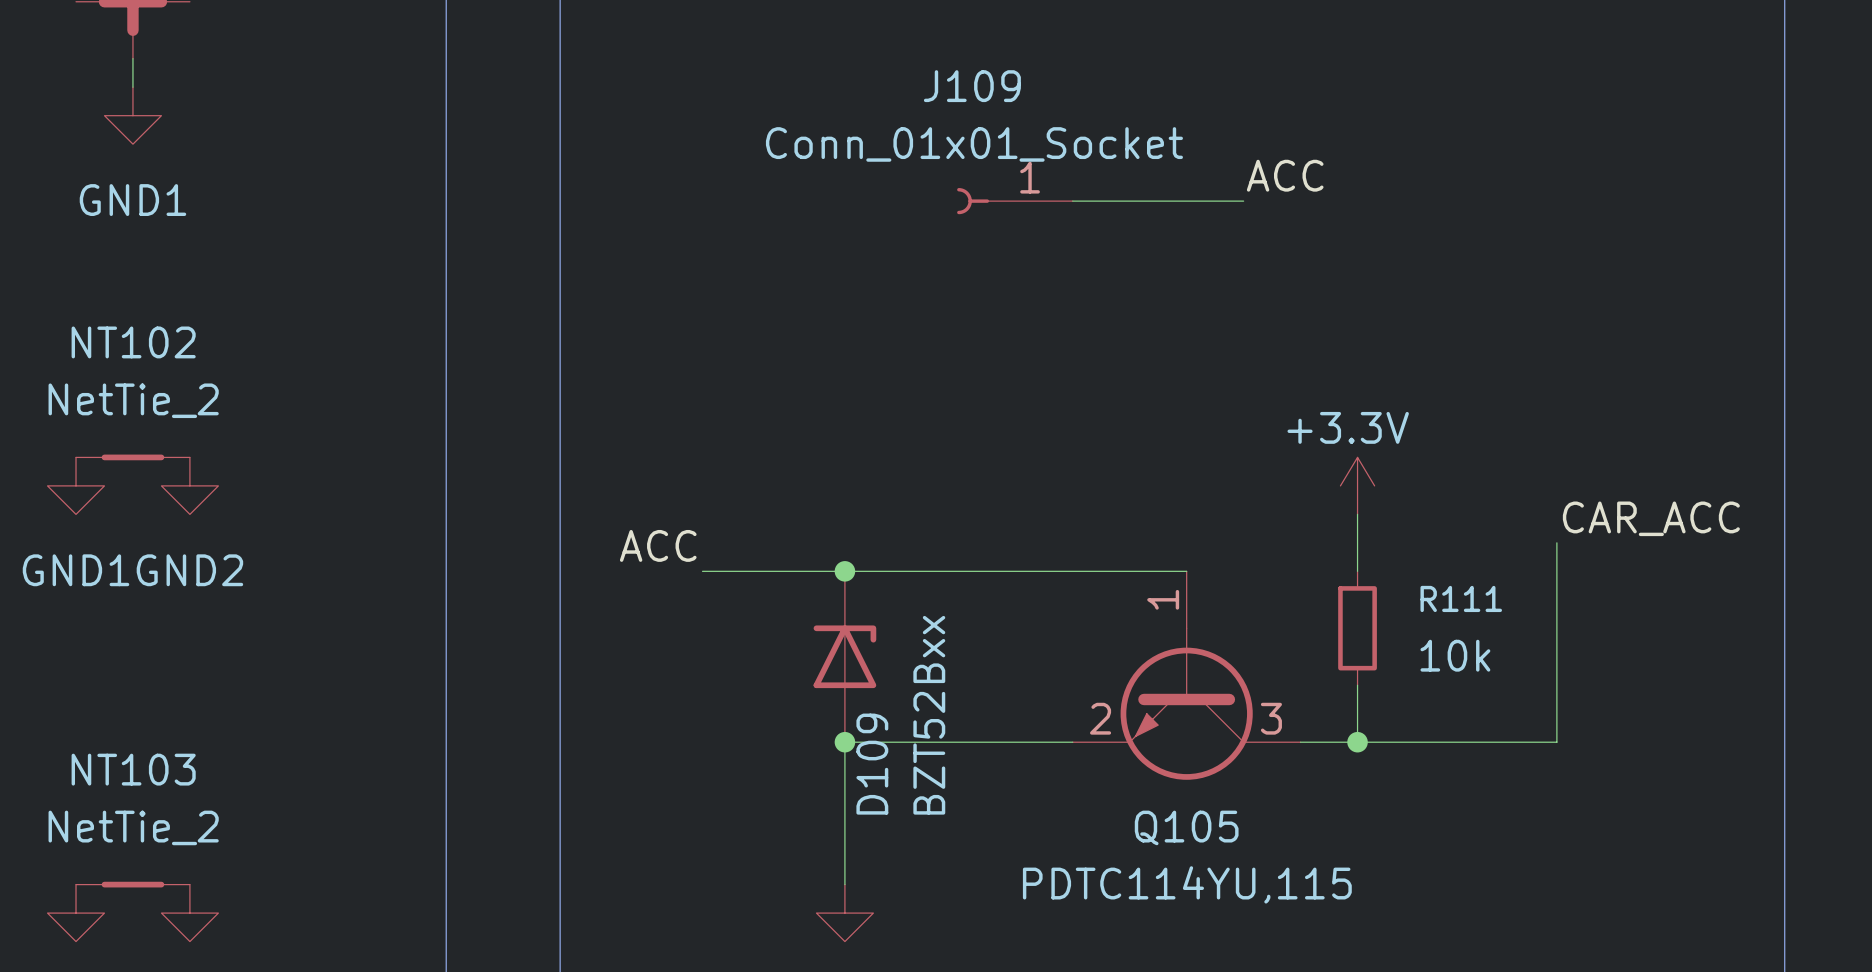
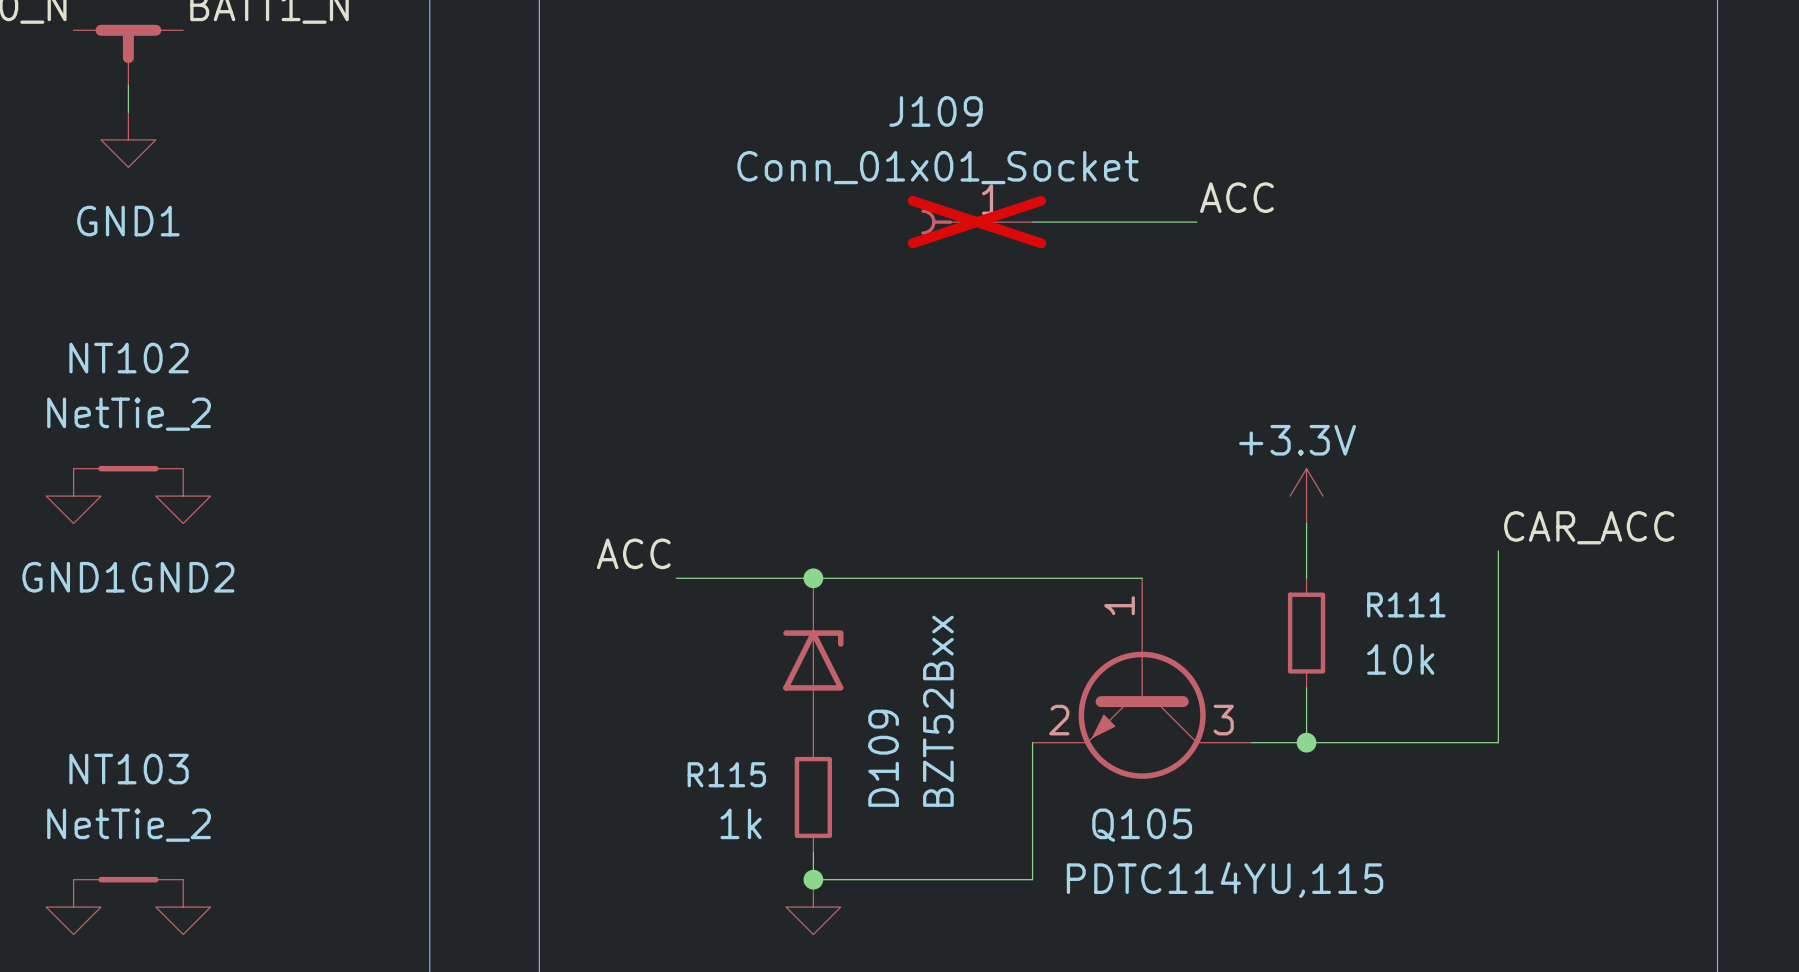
J109 do-not-place cross: none -> (976, 222)
D109 value position: BZT52Bxx (929, 715) -> BZT52Bxx (938, 711)
junction: (844, 742) -> none
wire: (1072, 742) (844, 742) (844, 856) -> (1032, 742) (1032, 879) (813, 879)
D109 name position: D109 (872, 764) -> D109 (883, 758)
R115: none -> 1k (813, 797)
junction: none -> (813, 879)
Q105 value position: PDTC114YU,115 (1187, 884) -> PDTC114YU,115 (1225, 879)

